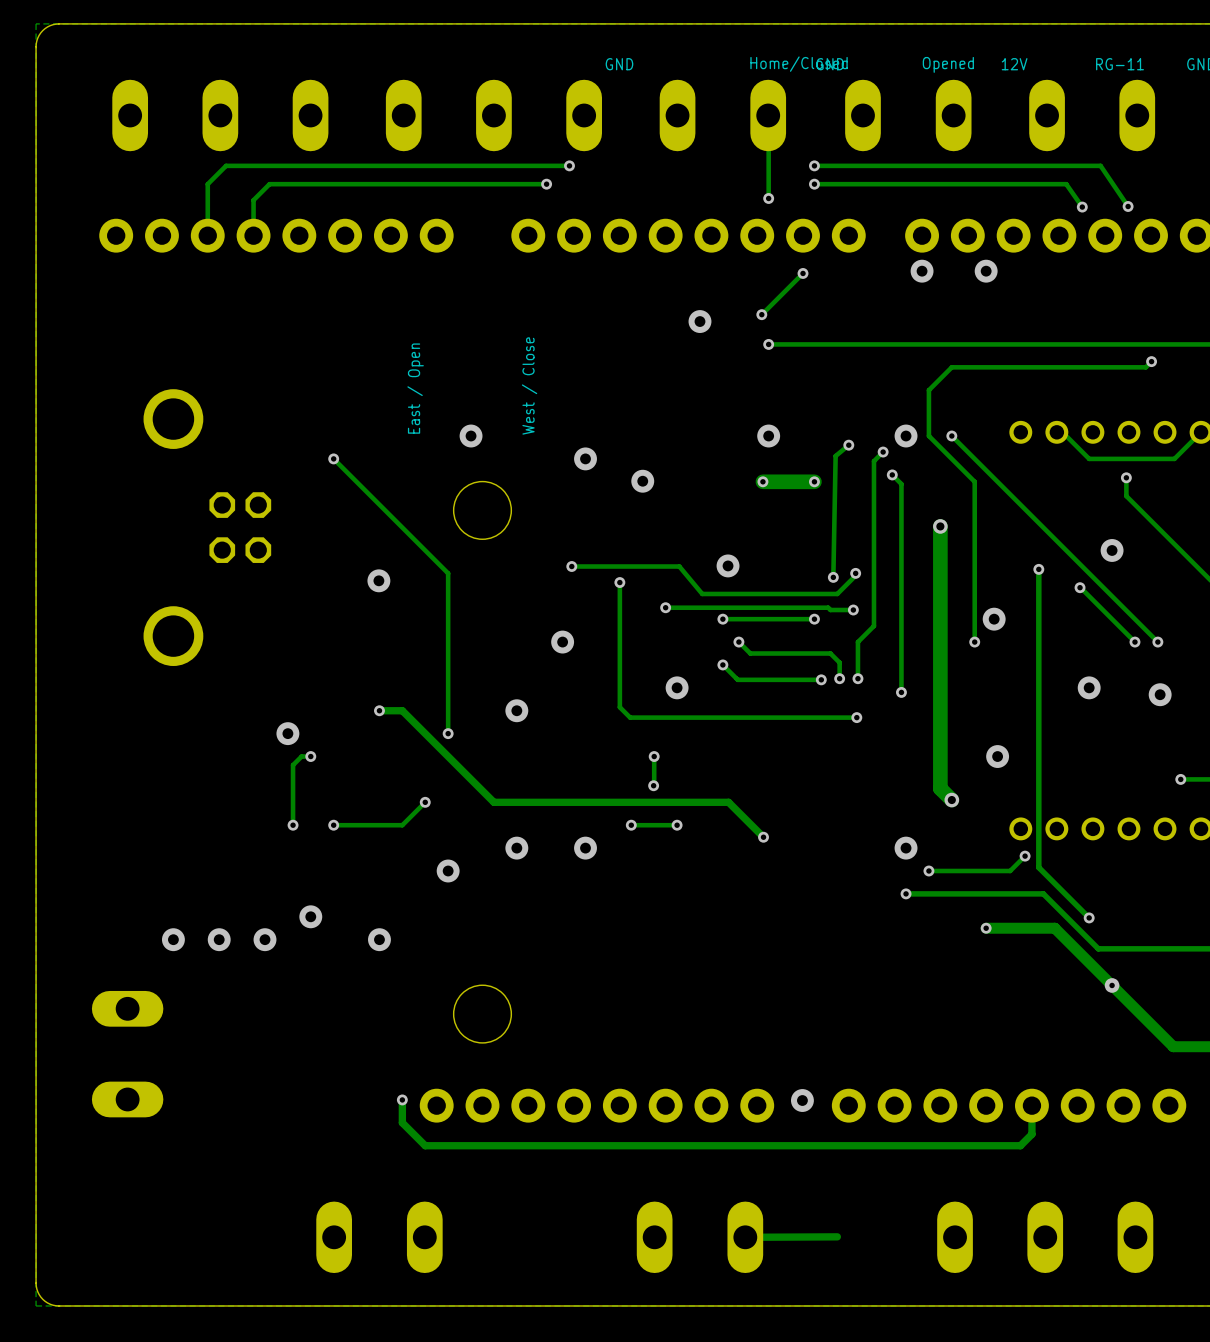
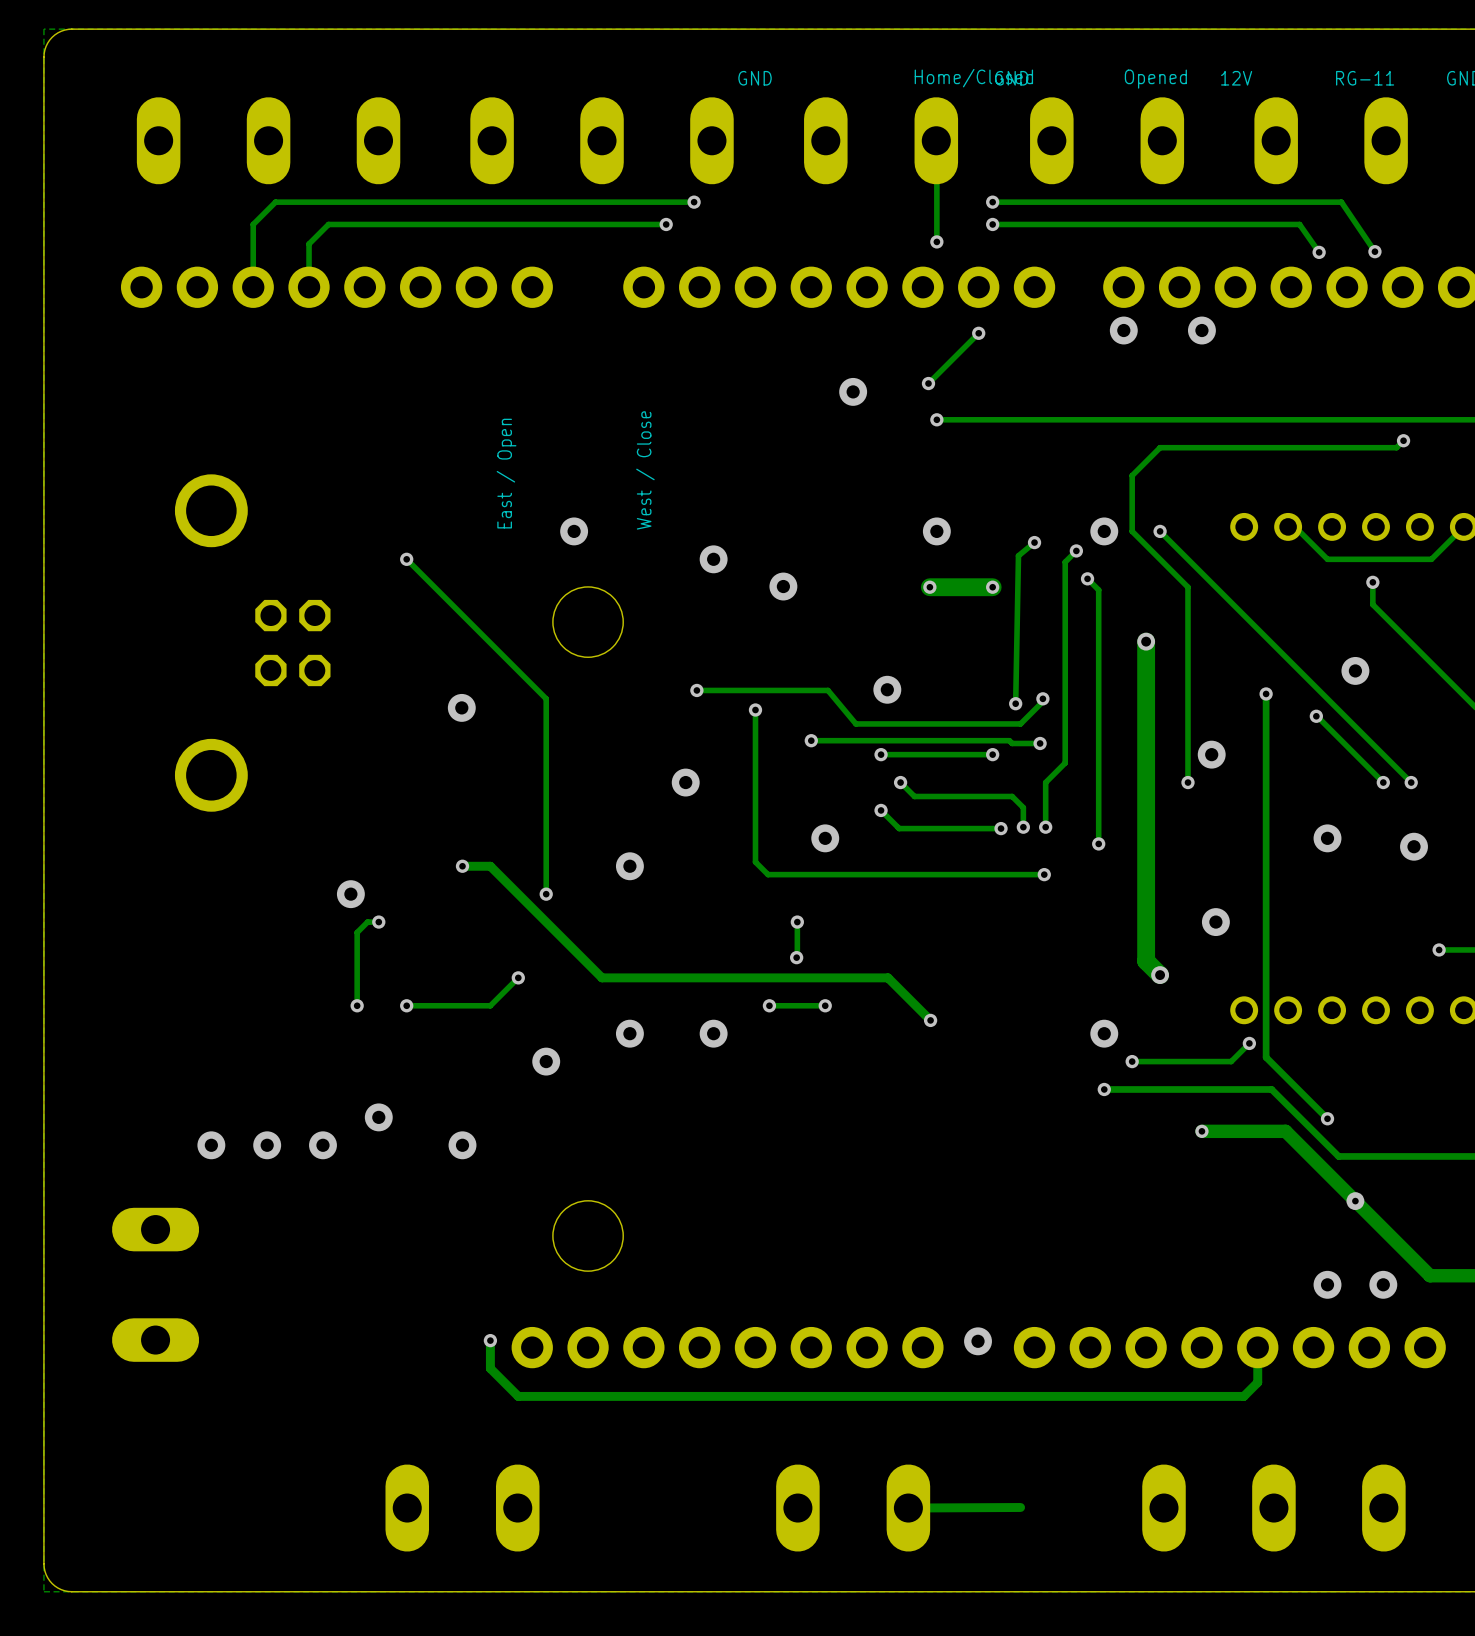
via: none -> (1327, 1284)
via: none -> (1383, 1284)

